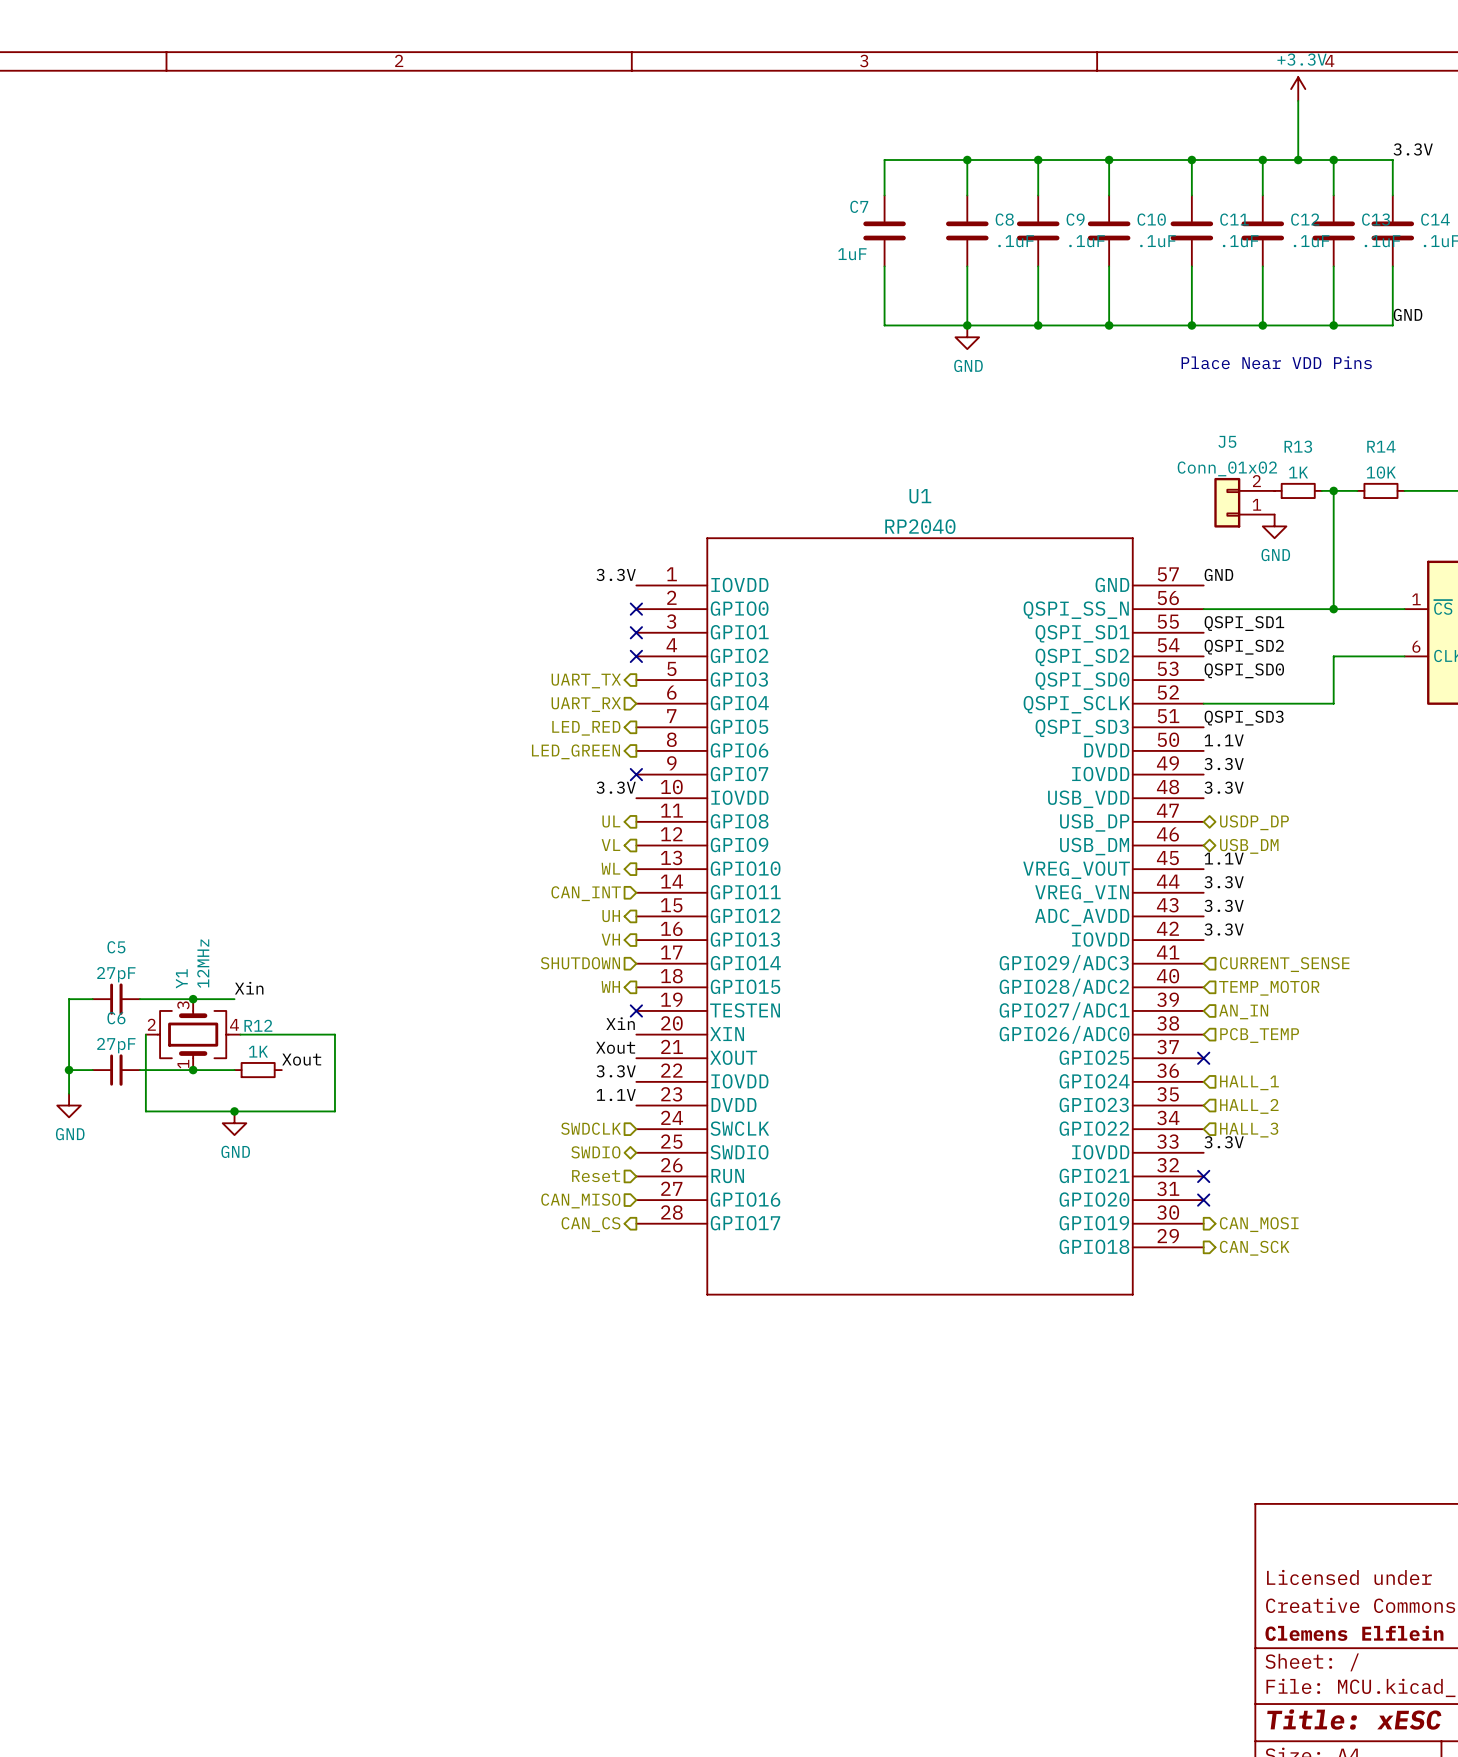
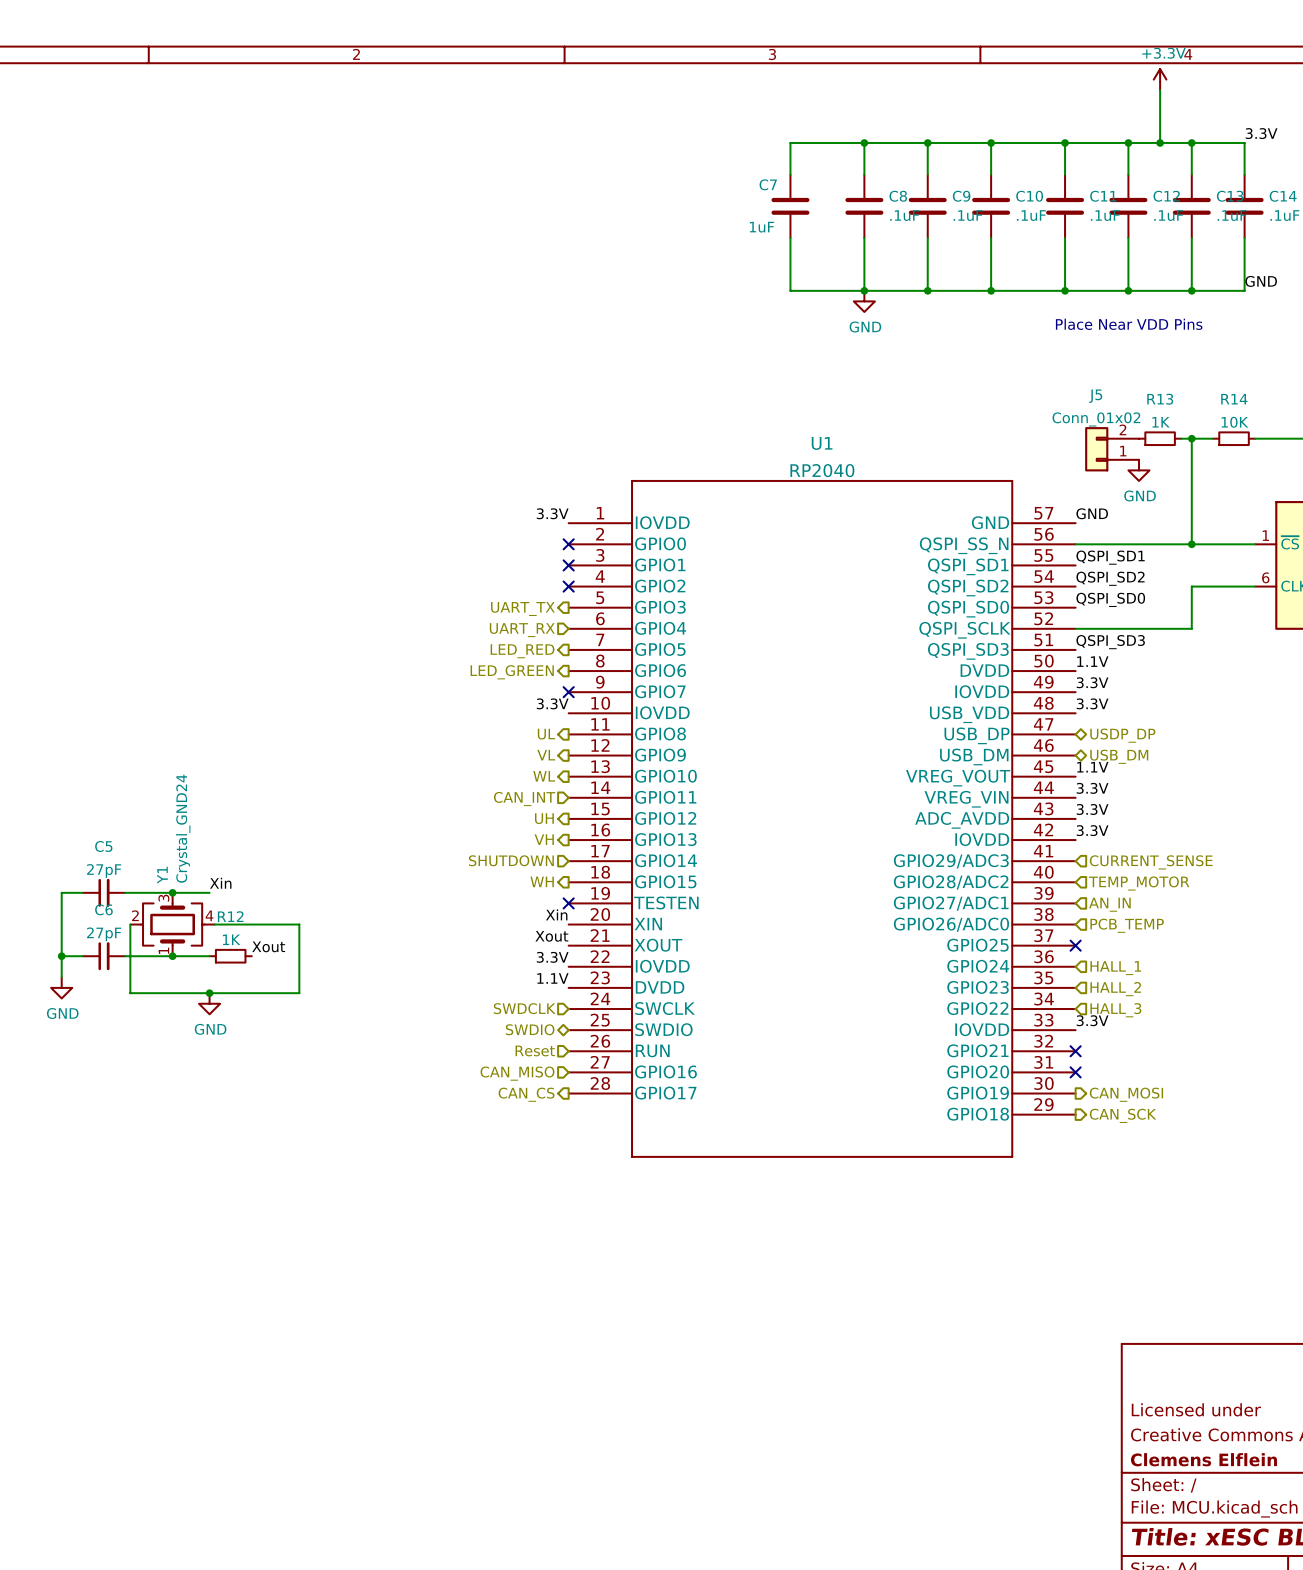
Y1 value: 12MHz (203, 963) -> Crystal_GND24 (183, 828)

